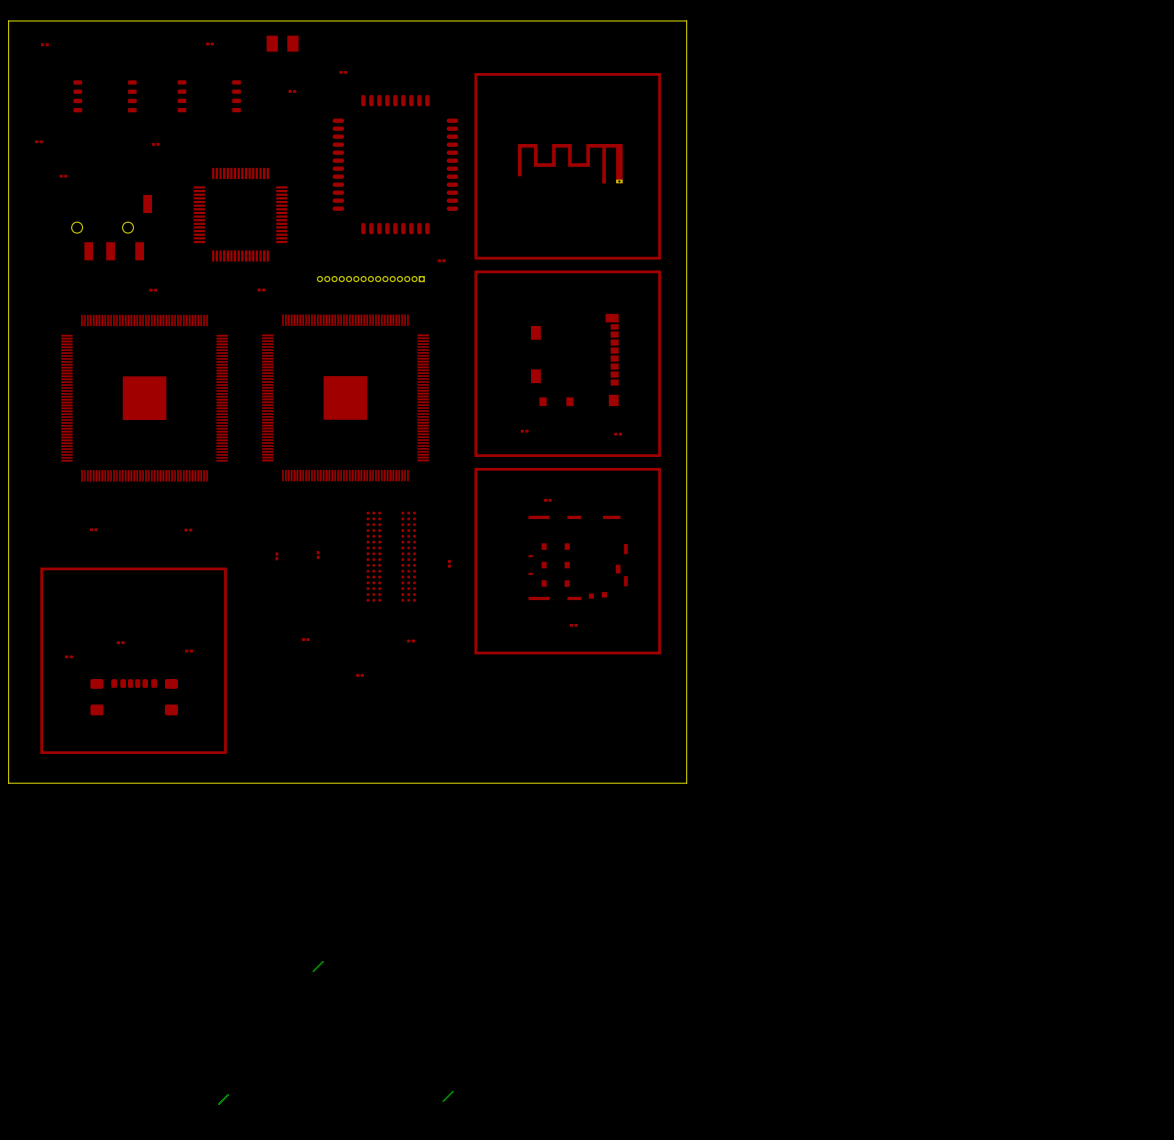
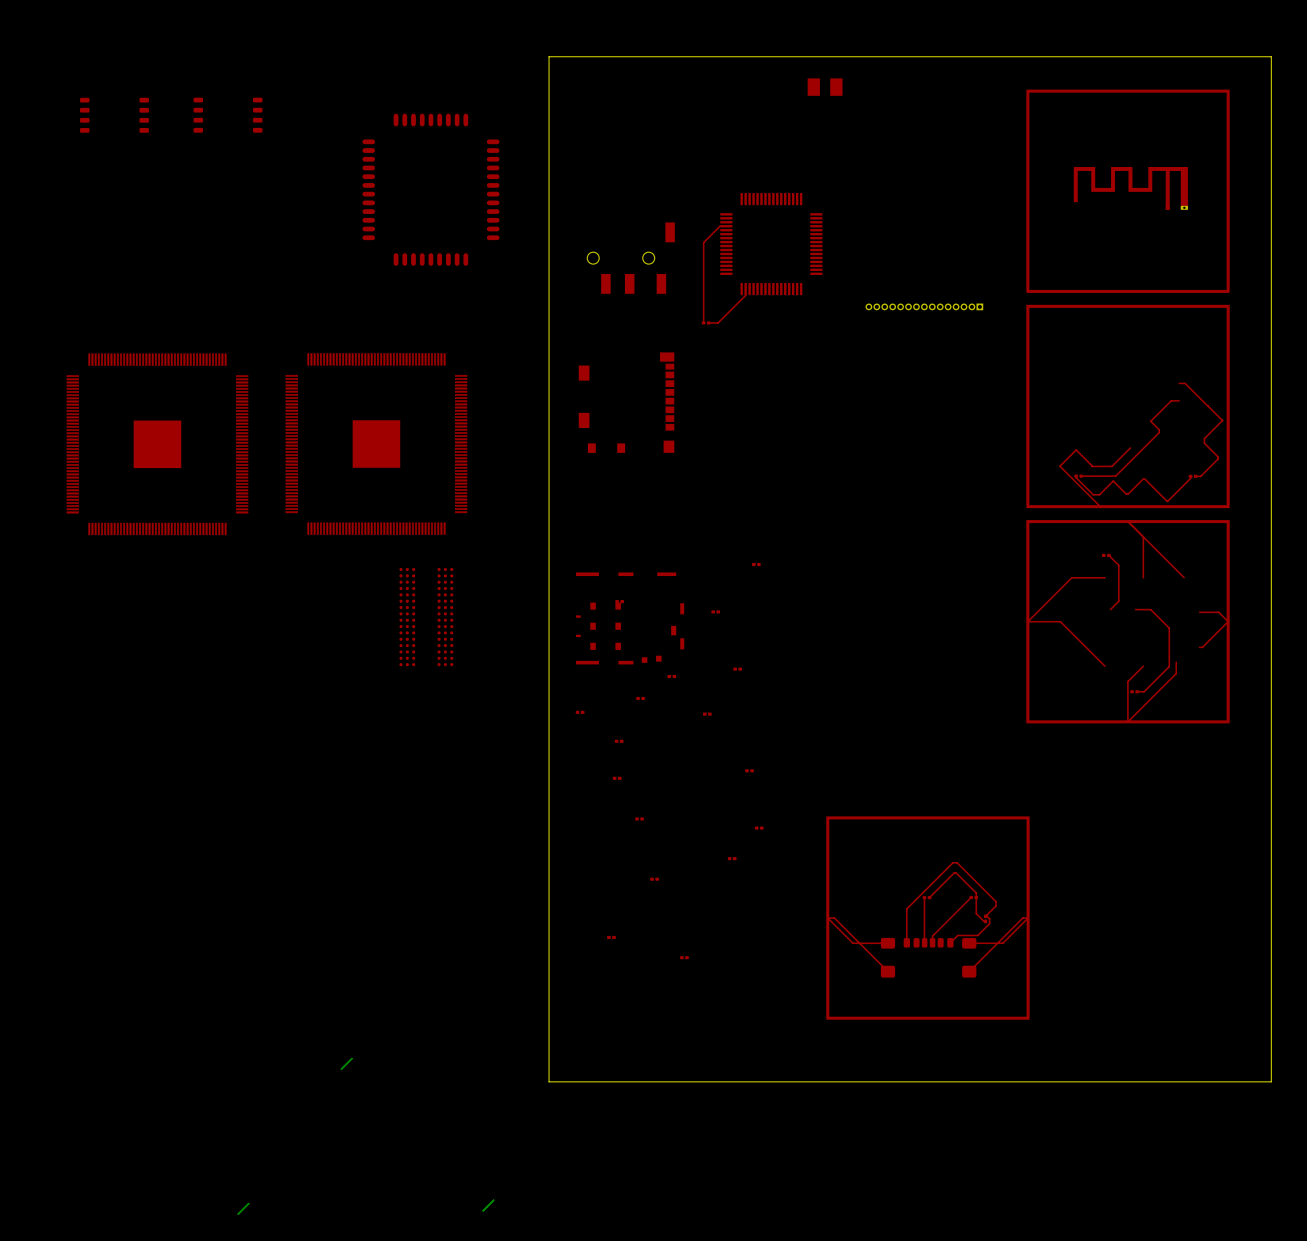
board edge: (686, 20) (8, 20) (8, 783) (686, 783) (686, 20) -> none
board edge: none -> (1271, 56) (549, 56) (549, 1081) (1271, 1081) (1271, 56)
part: (210, 43) -> none
part: (282, 43) -> none
part: (44, 44) -> none
part: none -> (825, 87)
part: (343, 72) -> none
part: (292, 91) -> none
part: (39, 141) -> none
part: (155, 144) -> none
part: (570, 163) -> none
part: none -> (1130, 188)
part: (567, 166) -> none
part: none -> (1128, 191)
part: (63, 176) -> none
top track: none -> (726, 226) (720, 226) (703, 242) (703, 322)
part: (240, 214) -> none
part: none -> (771, 244)
part: (111, 227) -> none
part: none -> (631, 258)
top track: none -> (745, 289) (745, 295) (718, 322) (708, 322)
part: (441, 260) -> none
part: none -> (924, 306)
part: (370, 279) -> none
part: none -> (706, 322)
part: (261, 289) -> none
part: (153, 290) -> none
top track: none -> (1179, 383) (1185, 383) (1222, 420) (1204, 438) (1204, 443) (1218, 459) (1200, 476) (1195, 476)
top track: none -> (1179, 400) (1171, 400) (1150, 421) (1159, 429) (1159, 432) (1115, 476) (1081, 476)
part: (567, 363) -> none
part: none -> (1128, 406)
top track: none -> (1130, 447) (1111, 466) (1091, 466) (1076, 450) (1060, 466) (1100, 506)
top track: none -> (1076, 476) (1093, 494) (1099, 494) (1113, 481) (1128, 494) (1145, 479) (1167, 501) (1190, 476)
part: none -> (1078, 476)
part: none -> (1193, 476)
part: (524, 431) -> none
part: (618, 434) -> none
top track: none -> (1128, 521) (1184, 577)
top track: none -> (1143, 536) (1143, 577)
part: (547, 500) -> none
part: none -> (1106, 555)
top track: none -> (1108, 555) (1118, 565) (1118, 601) (1110, 609)
part: none -> (756, 564)
top track: none -> (1104, 577) (1071, 577) (1027, 621) (1060, 621) (1104, 666)
part: (93, 529) -> none
part: (188, 530) -> none
part: none -> (619, 601)
top track: none -> (1135, 609) (1150, 609) (1169, 628) (1169, 666) (1144, 691) (1137, 691)
part: none -> (715, 611)
top track: none -> (1199, 612) (1218, 612) (1228, 621) (1202, 647) (1199, 647)
part: (318, 555) -> none
part: (276, 556) -> none
part: none -> (1128, 621)
part: (567, 561) -> none
part: (449, 563) -> none
top track: none -> (1176, 662) (1176, 673) (1128, 721)
top track: none -> (1143, 666) (1127, 681) (1127, 721)
part: none -> (737, 669)
part: none -> (671, 676)
part position: (573, 625) -> (640, 698)
part: none -> (1134, 691)
part: (305, 639) -> none
part: (411, 641) -> none
part: (120, 642) -> none
part: none -> (580, 712)
part: none -> (707, 714)
part: (189, 651) -> none
part: (68, 656) -> none
part: (133, 660) -> none
part: none -> (619, 741)
part: (360, 675) -> none
part: (134, 697) -> none
part: none -> (749, 770)
part: none -> (617, 778)
part: none -> (639, 818)
part: none -> (759, 828)
part: none -> (732, 858)
part: none -> (654, 879)
top track: none -> (971, 897) (932, 936) (932, 942)
part: none -> (973, 897)
top track: none -> (924, 897) (924, 942)
part: none -> (926, 897)
top track: none -> (929, 897) (956, 872) (976, 893) (976, 913) (985, 921)
part: none -> (927, 918)
part: none -> (985, 918)
part: none -> (611, 937)
top track: none -> (887, 943) (853, 943) (827, 918) (834, 918) (887, 971)
top track: none -> (950, 942) (957, 935) (977, 935) (989, 923) (989, 918) (985, 916) (995, 906) (995, 901) (957, 862) (953, 862) (906, 908) (906, 942)
top track: none -> (969, 943) (1002, 943) (1028, 918) (1022, 918) (969, 971)
part: none -> (684, 957)
part: none -> (928, 957)

